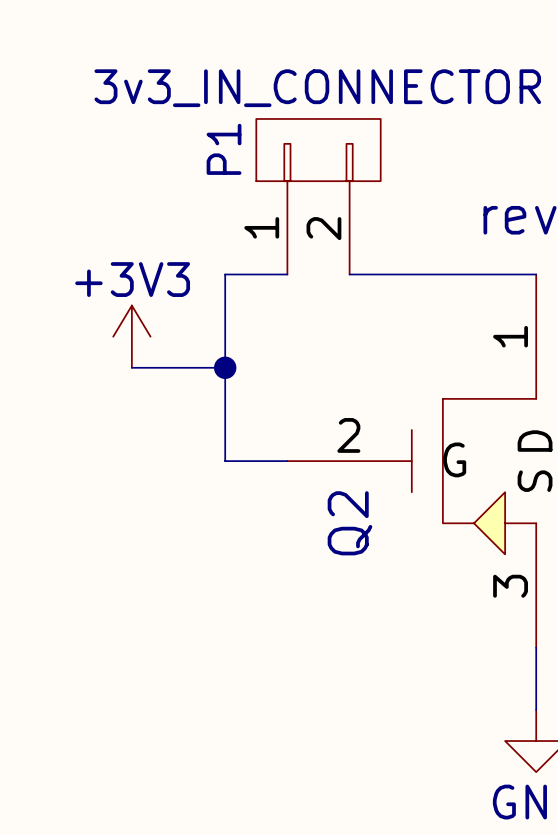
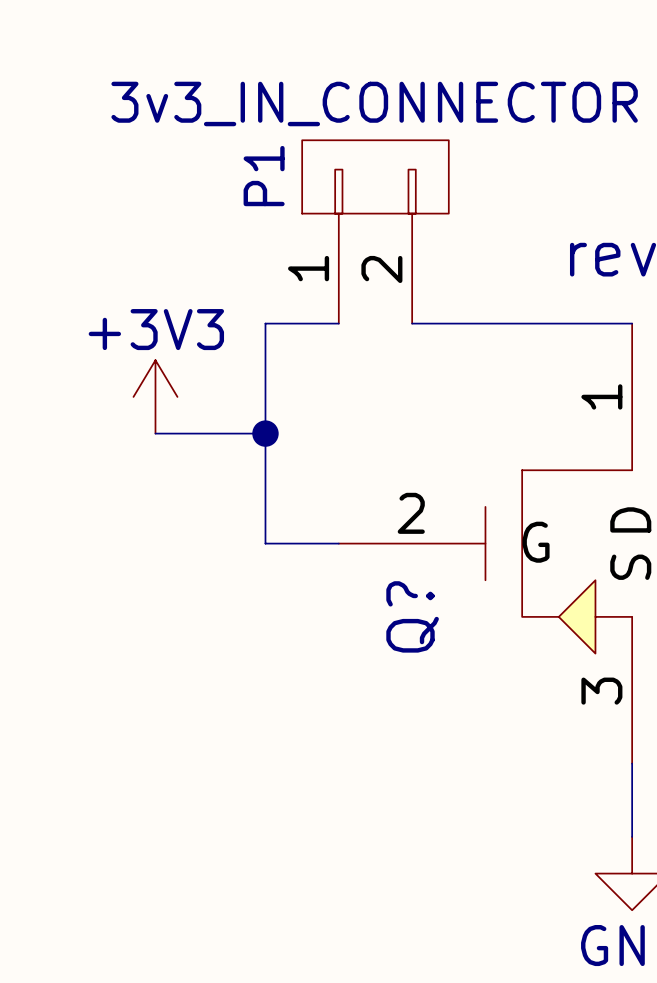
Q2 name: Q2 (349, 523) -> Q? (412, 616)

